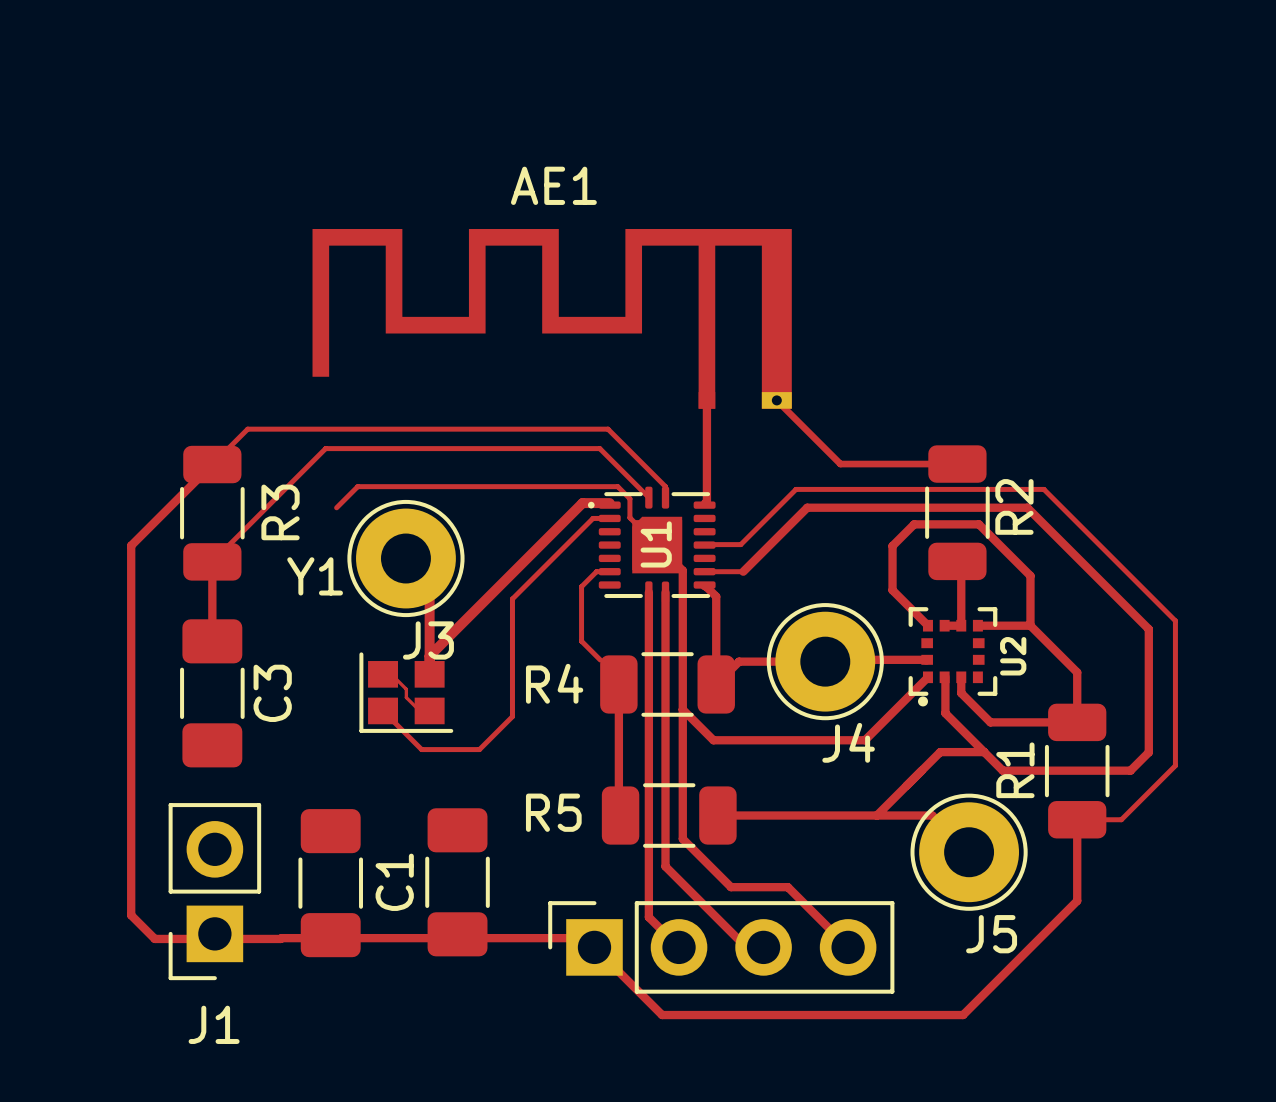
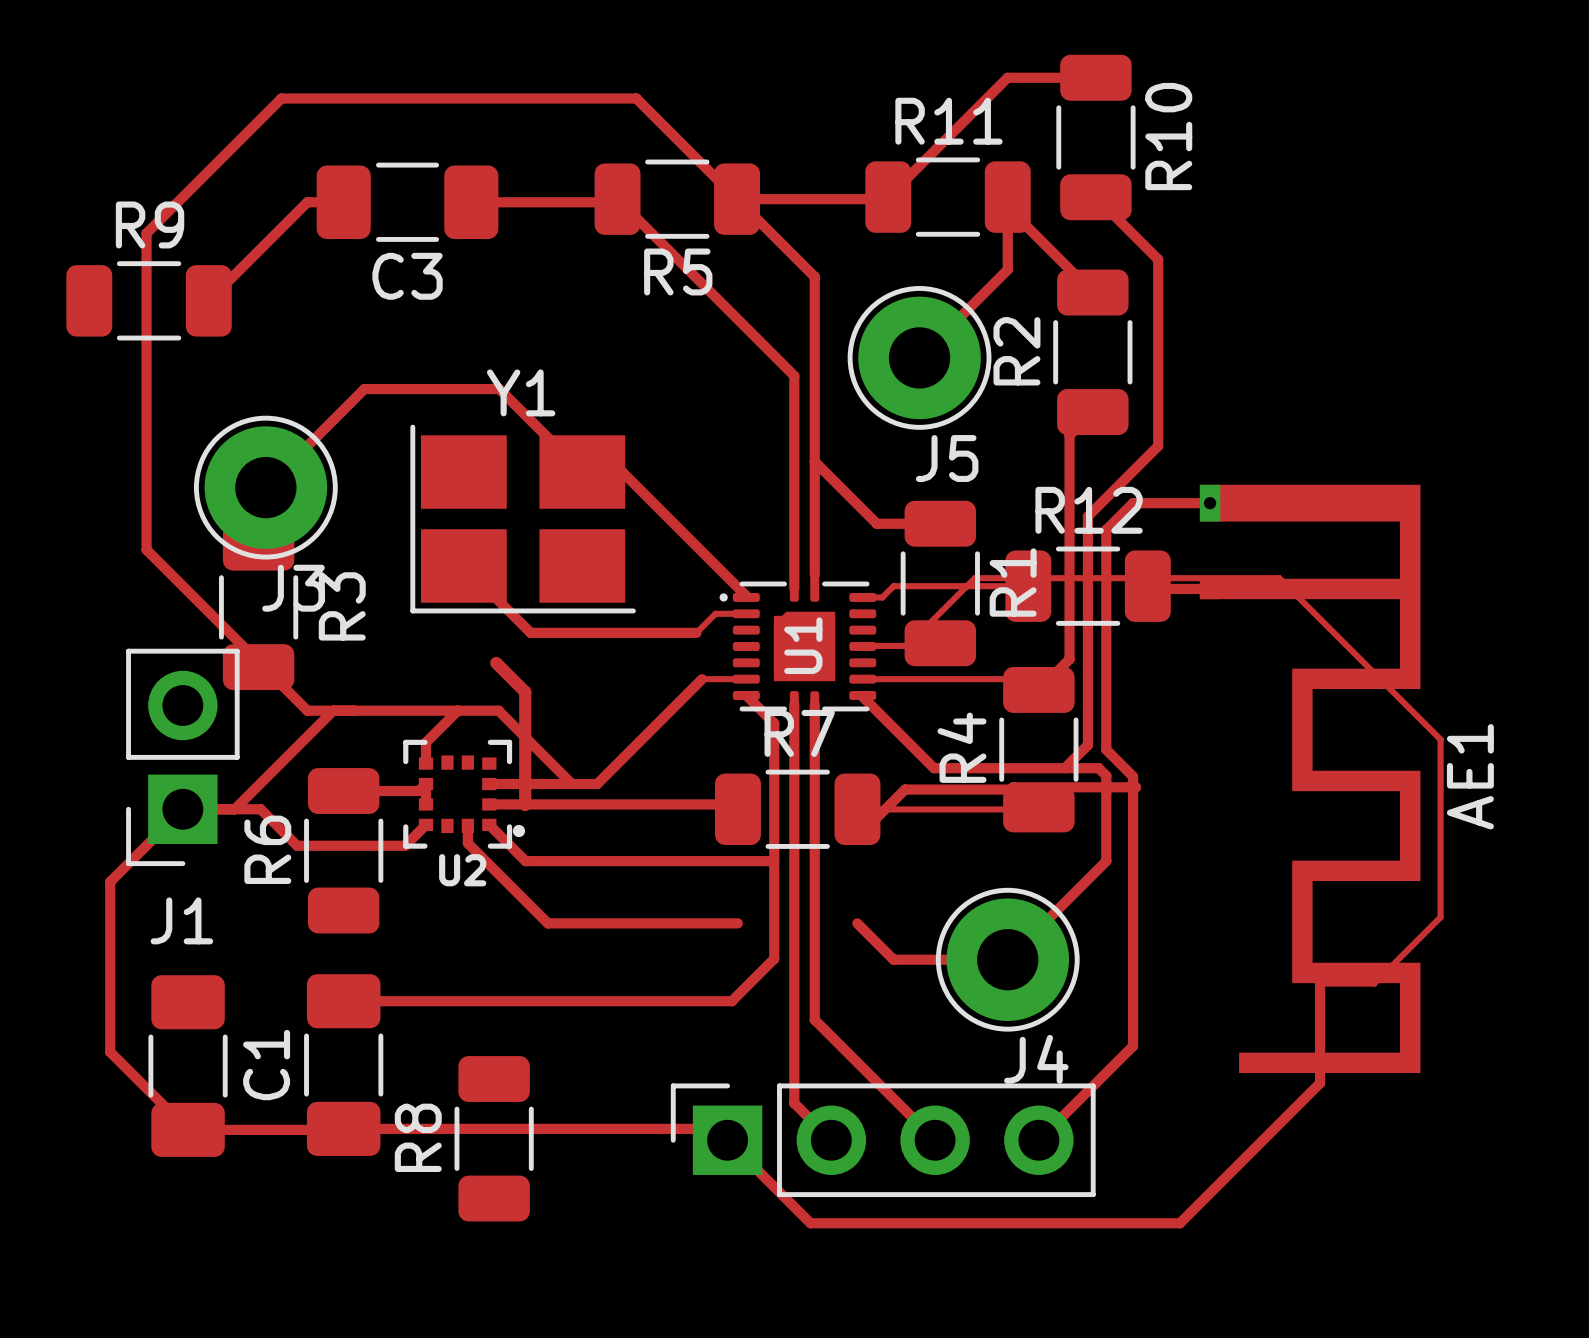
track: none -> (1095, 77) (1007, 77) (886, 199) (737, 199)
R10: none -> (1095, 137)
R11: none -> (948, 197)
track: none -> (1007, 197) (1007, 269) (919, 357)
track: none -> (1095, 197) (1158, 259) (1158, 446) (1087, 516) (1087, 745) (1064, 768)
track: none -> (343, 202) (307, 202) (208, 300)
AE1 name position: AE1 (553, 185) -> AE1 (1470, 776)
track: none -> (1007, 207) (1092, 292)
AE1 footprint: [312, 228, 792, 409] -> [1199, 484, 1421, 1074]
R9: none -> (149, 300)
track: none -> (814, 461) (876, 523) (940, 523)
track: (706, 400) (706, 501) (704, 503) -> (1017, 597) (1028, 586) (893, 586) (882, 597) (862, 597)
track: (776, 400) (840, 464) (957, 464) -> none
track: (665, 486) (608, 429) (247, 429) (131, 545) (131, 915) -> (426, 824) (405, 845) (297, 845) (260, 809) (182, 809) (110, 881) (110, 1052) (158, 1100)
track: none -> (814, 574) (814, 276) (636, 98) (281, 98) (146, 233) (146, 549) (307, 710) (498, 710) (571, 784)
R12: none -> (1088, 586)
track: none -> (1147, 586) (1150, 588) (1210, 588)
track: (648, 497) (599, 448) (325, 448) (212, 561) (212, 641) -> (794, 588) (794, 375) (617, 199) (611, 199) (608, 202) (471, 202)
track: (609, 503) (582, 503) (429, 656) -> (746, 595) (622, 472) (582, 472) (499, 389) (364, 389) (265, 487)
R2 name position: R2 (1014, 506) -> R2 (1016, 351)
track: (336, 507) (357, 486) (617, 486) (629, 498) (629, 517) (682, 570) (682, 838) (731, 887) (787, 887) (848, 947) -> (1210, 503) (1133, 503) (1106, 529) (1106, 749) (1133, 776) (1133, 1046) (1038, 1140)
R2 position: (957, 512) -> (1092, 352)
track: (593, 518) (512, 598) (512, 716) (479, 749) (421, 749) (383, 710) -> (725, 613) (715, 613) (696, 632) (530, 632) (463, 566)
J3 position: (405, 558) -> (265, 487)
track: (957, 561) (961, 565) (961, 625) (944, 625) -> none
track: (596, 571) (581, 586) (581, 641) (600, 659) -> (730, 679) (702, 679) (597, 784) (489, 784)
track: (743, 571) (807, 507) (1027, 507) (1148, 629) (1148, 752) (1130, 770) (1002, 770) (945, 713) (945, 676) -> (910, 679) (1028, 679) (1038, 689) (1069, 659) (1069, 435) (1092, 412)
Y1 name position: Y1 (315, 576) -> Y1 (521, 392)
track: none -> (747, 696) (774, 723) (774, 958) (731, 1001) (342, 1002)
track: (704, 586) (716, 596) (716, 668) (720, 664) -> (862, 696) (934, 768) (1098, 768) (1106, 775) (1106, 861) (1007, 959) (893, 959) (857, 923)
track: none -> (333, 710) (234, 809)
track: none -> (457, 710) (426, 742) (426, 763)
track: (927, 625) (892, 590) (892, 546) (914, 524) (978, 524) (1030, 575) (1030, 625) -> none
track: (977, 625) (1030, 625) -> none
track: (1030, 625) (1077, 672) (1077, 722) (990, 722) (961, 693) (961, 677) -> none
Y1 footprint: [359, 652, 454, 733] -> [410, 424, 636, 614]
U2 rotation: 0° (952, 656) -> 90° counterclockwise (464, 794)
U2 position: (952, 656) -> (464, 794)
U2 name position: U2 (1013, 656) -> U2 (462, 870)
J4 position: (825, 661) -> (1007, 959)
track: none -> (343, 791) (418, 791) (426, 784) (426, 804)
track: (618, 668) (618, 813) (620, 815) -> none
track: none -> (489, 804) (733, 804) (737, 809)
track: (383, 674) (391, 674) (406, 689) (406, 697) (419, 710) (429, 710) -> none
R7: none -> (797, 809)
track: none -> (857, 809) (1038, 809)
track: (927, 677) (865, 740) (713, 740) (682, 709) -> none
R4 rotation: 0° (667, 684) -> 90° clockwise (1038, 749)
R4 position: (667, 684) -> (1038, 749)
track: none -> (489, 824) (525, 861) (774, 861)
track: none -> (467, 825) (467, 843) (547, 923) (737, 923)
C3 rotation: 0° (212, 693) -> 90° clockwise (407, 202)
C3 position: (212, 693) -> (407, 202)
R6: none -> (343, 850)
track: (984, 752) (940, 752) (876, 815) -> none
R1 name position: R1 (1015, 770) -> R1 (1013, 582)
R1 position: (1077, 771) -> (940, 583)
R5 name position: R5 (553, 812) -> R5 (678, 271)
R5 position: (669, 815) -> (677, 199)
track: (717, 815) (932, 815) (969, 852) -> none
track: (665, 849) (665, 866) (746, 947) (763, 947) -> (814, 1019) (935, 1140)
J5 position: (969, 852) -> (919, 357)
C1 position: (457, 882) -> (343, 1065)
part position: (330, 883) -> (188, 1066)
J1 position: (214, 891) -> (182, 757)
R8: none -> (494, 1138)

